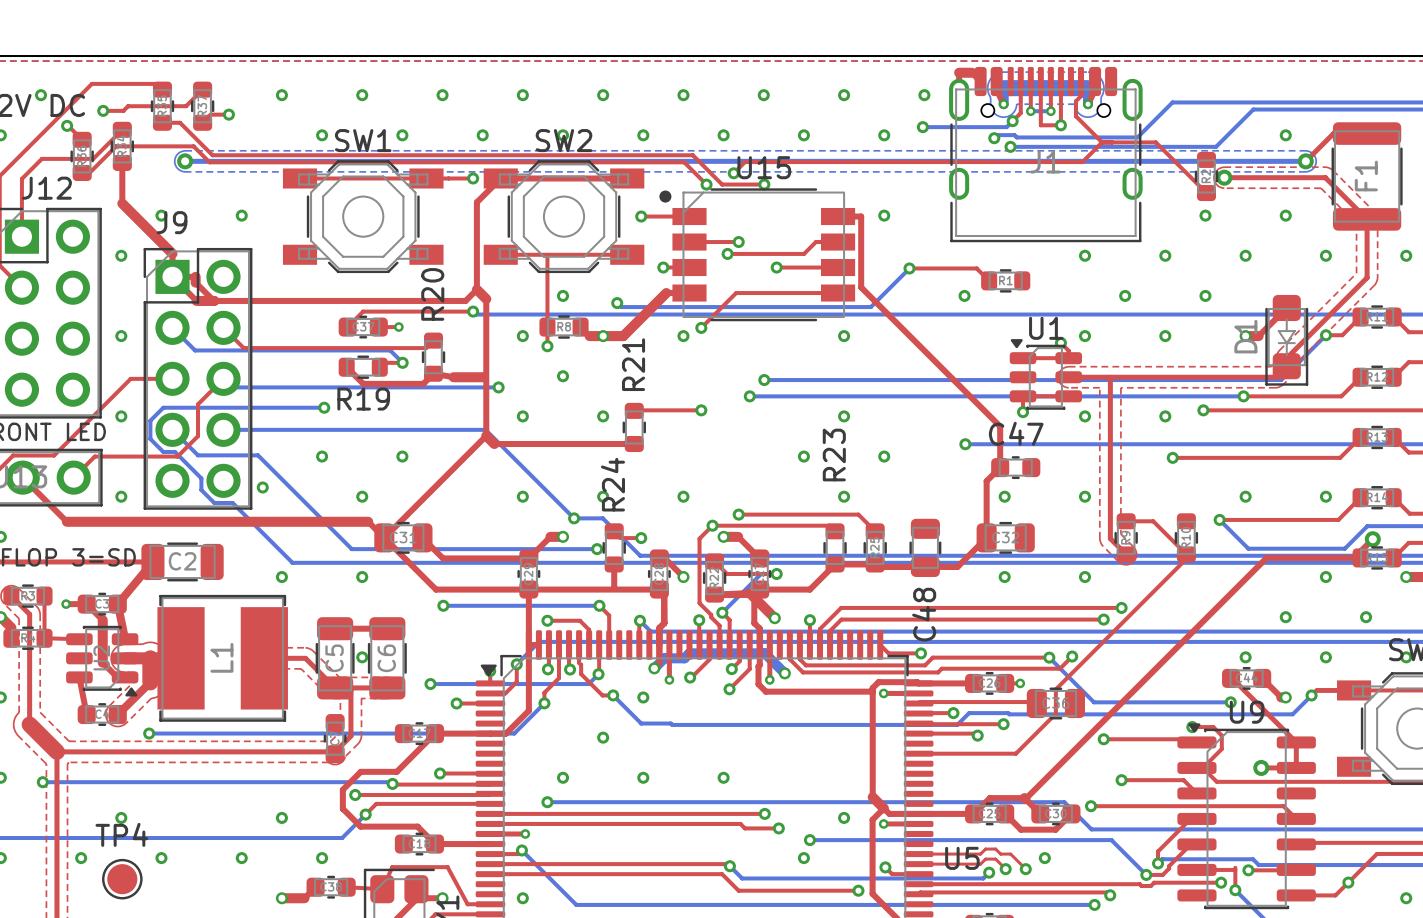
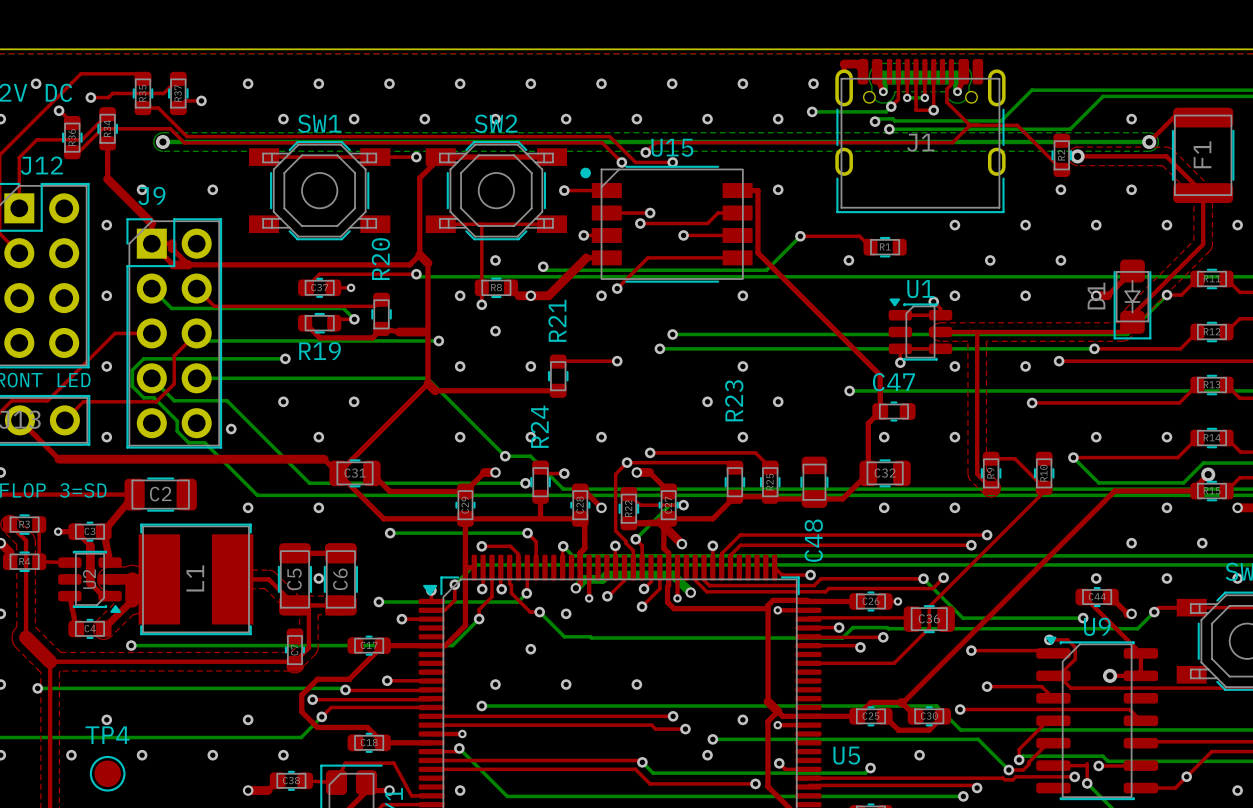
top track: (918, 854) (980, 854) (985, 849) (995, 849) (1000, 854) (1010, 854) (1025, 869) -> none
top track: (918, 864) (980, 864) (985, 859) (995, 859) (1005, 869) -> none
via: (1005, 869) -> none
via: (1025, 869) -> none

